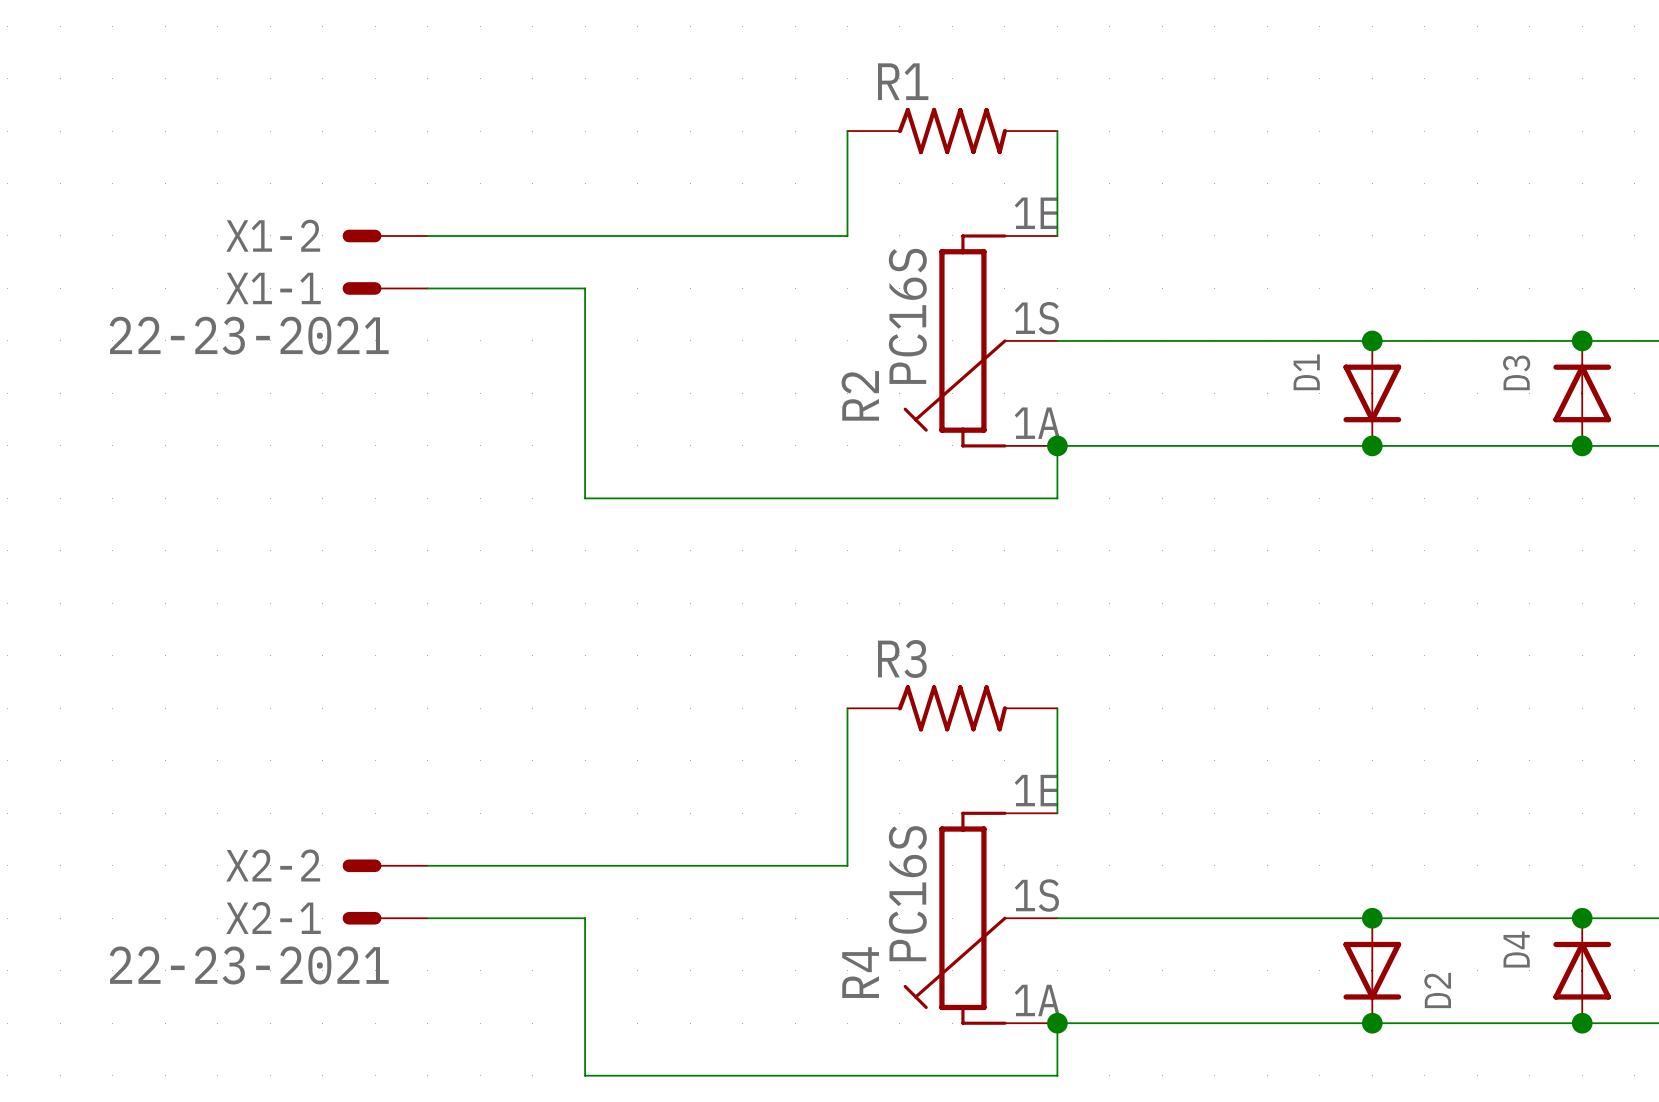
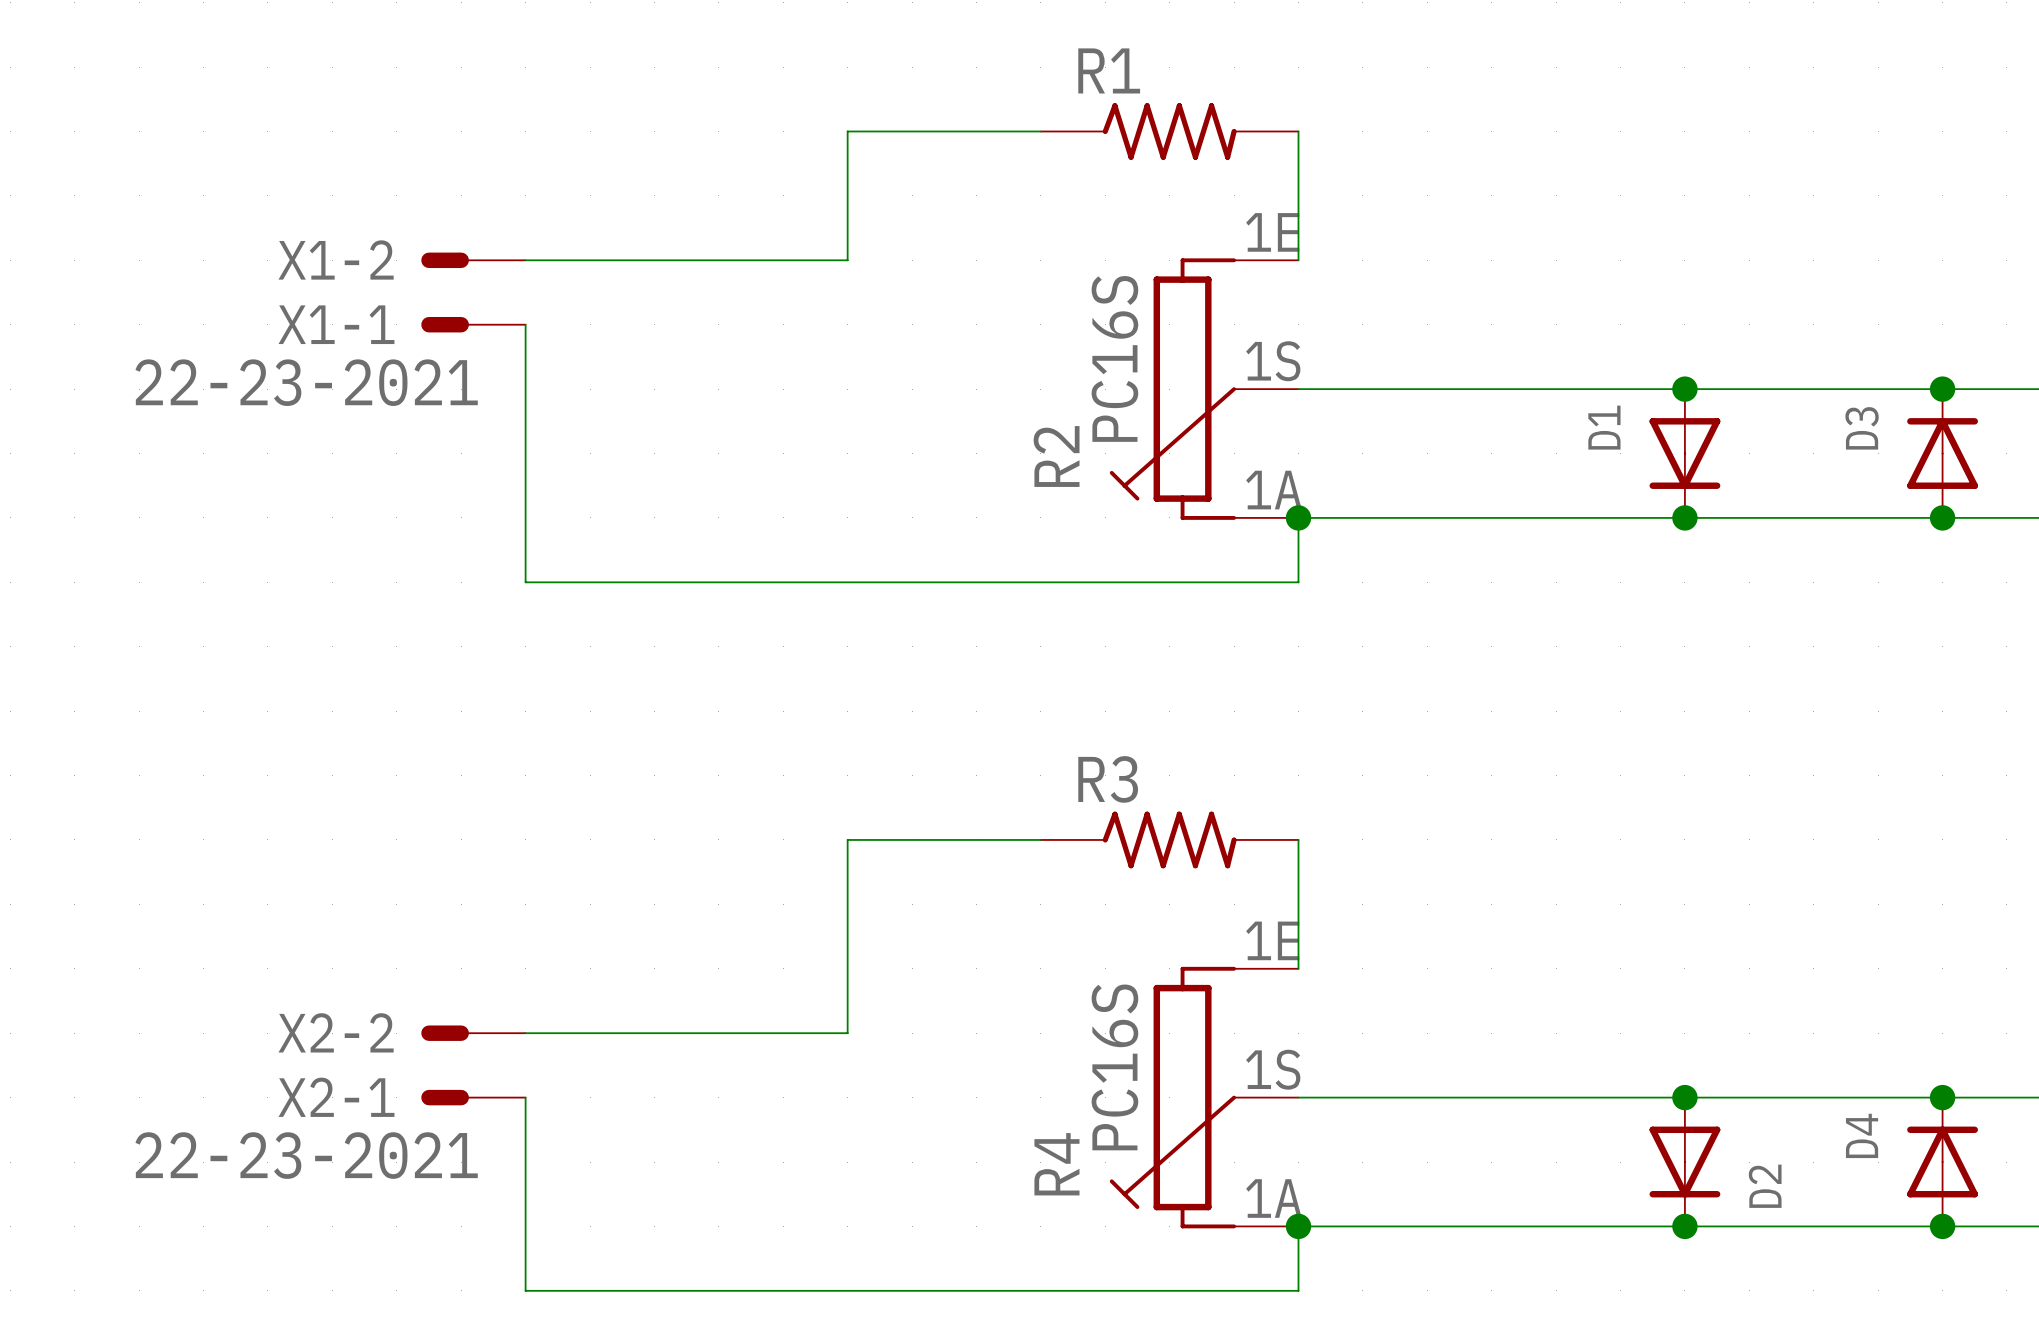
wire: (847, 131) (847, 235) (690, 235) -> (1040, 131) (847, 131) (847, 260)
wire: (427, 288) (585, 288) (585, 498) -> (525, 324) (525, 582) (718, 582)
wire: (847, 708) (847, 865) (690, 865) -> (1040, 839) (847, 839) (847, 1033)
wire: (427, 918) (585, 918) (585, 1075) -> (525, 1097) (525, 1290) (718, 1290)

